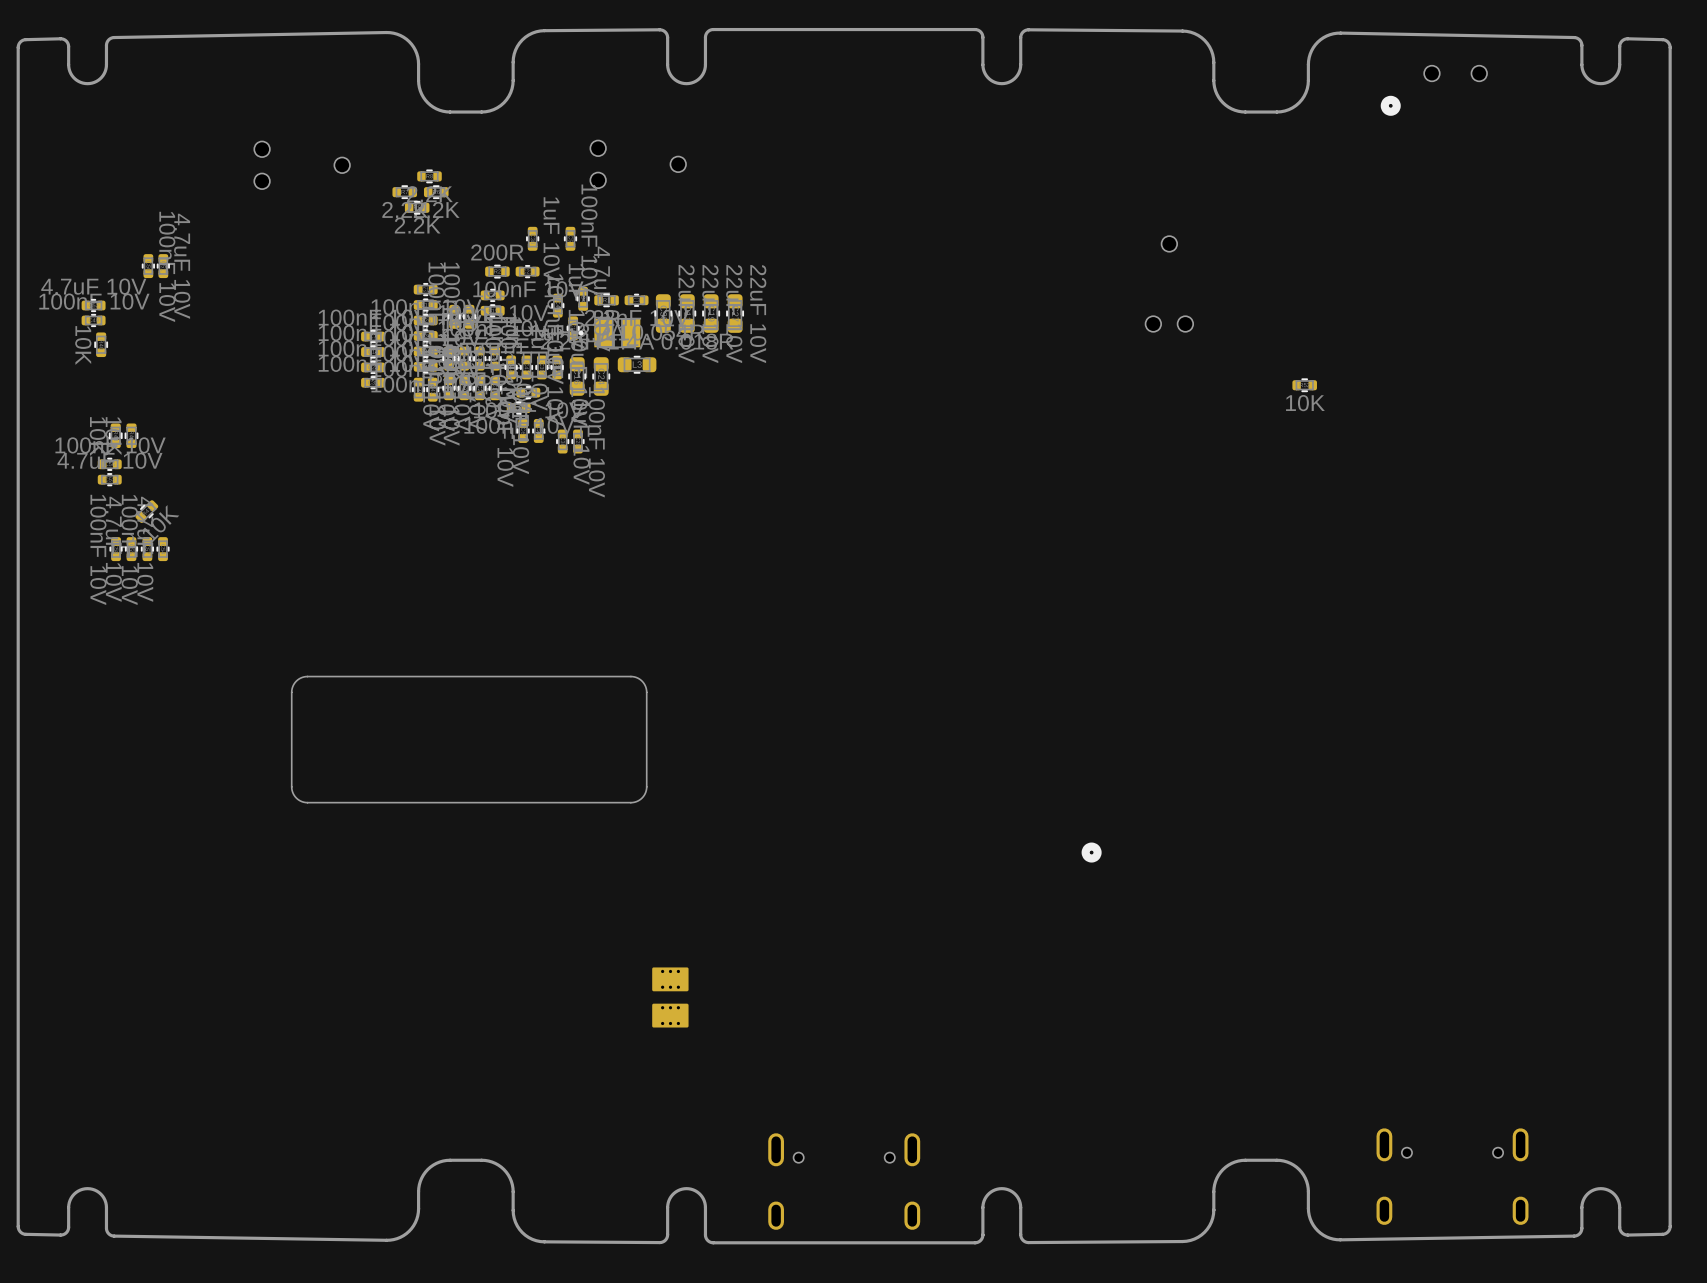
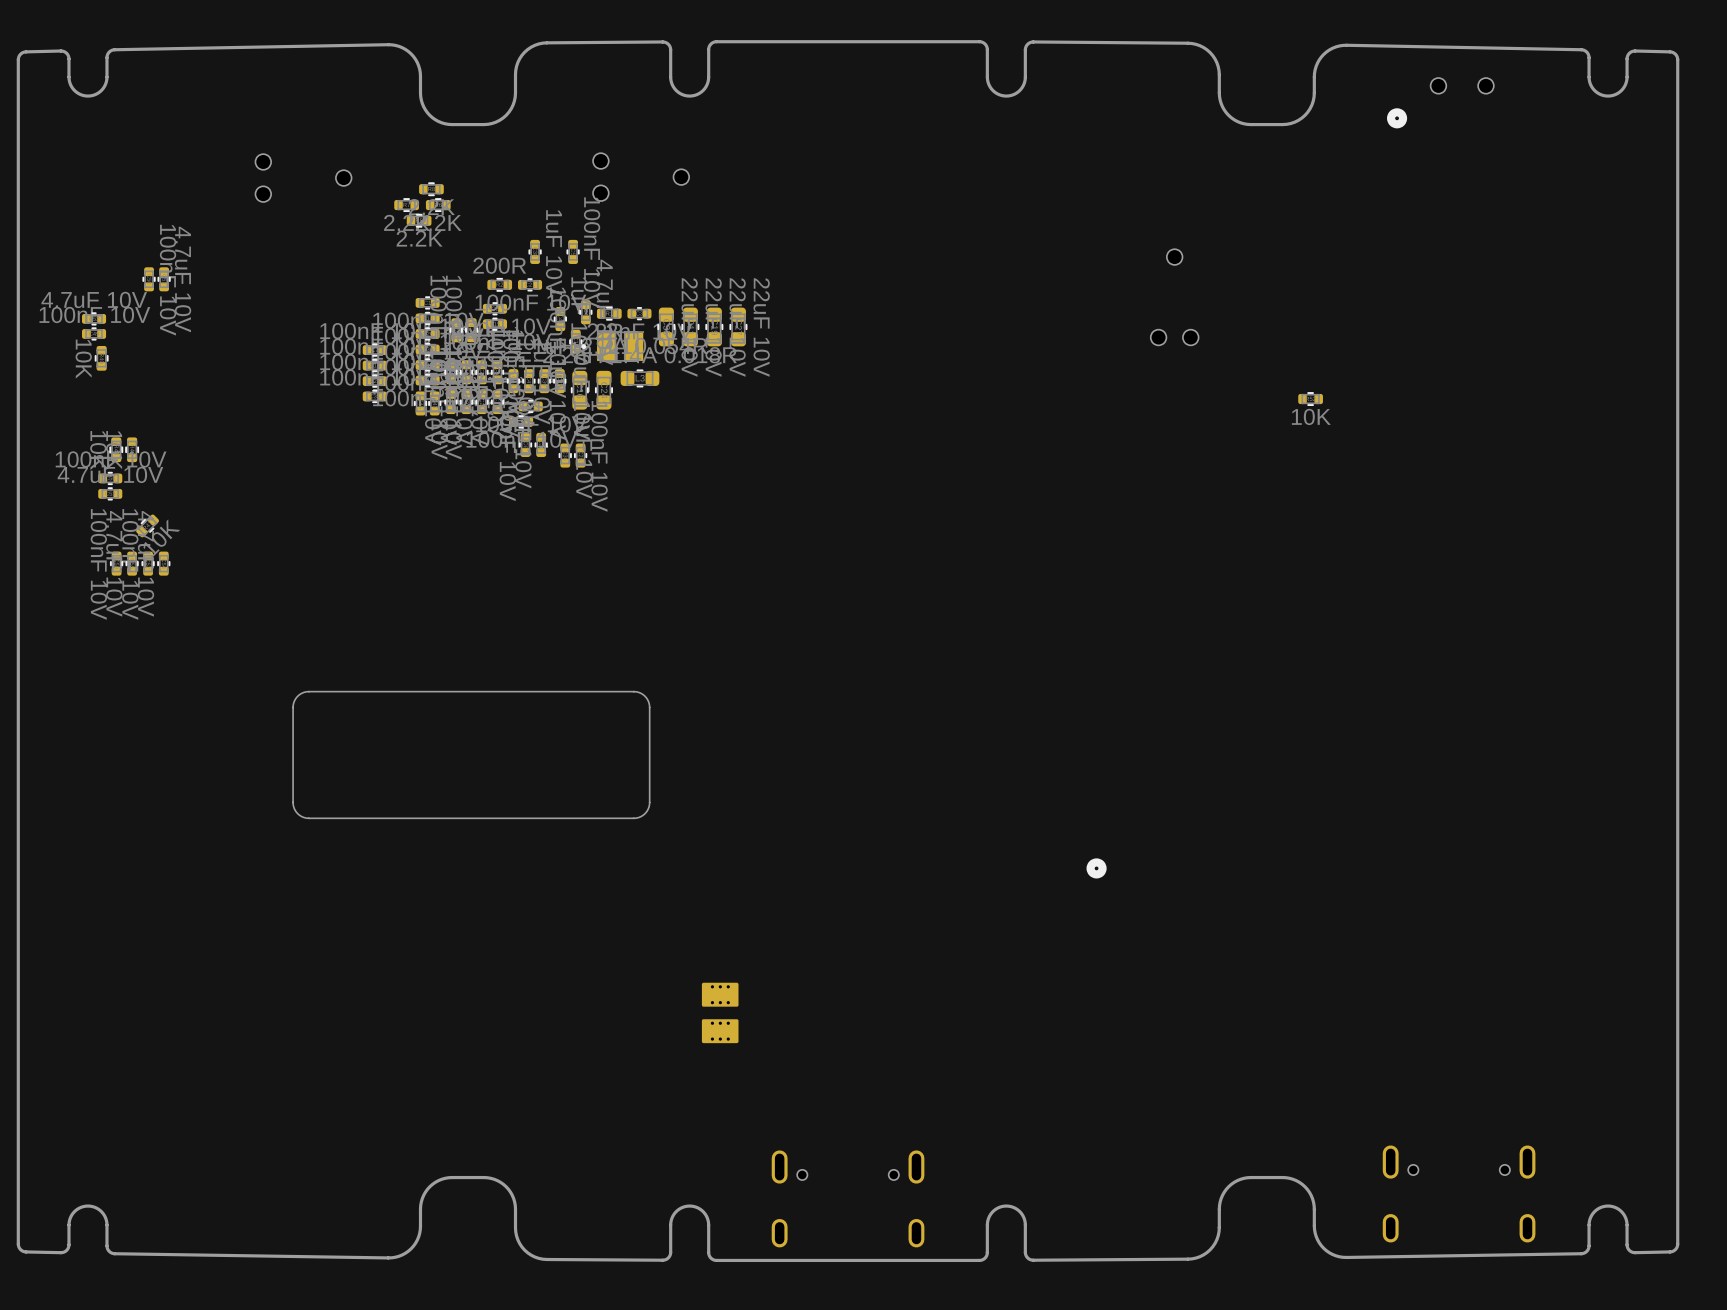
part position: (670, 997) -> (720, 1012)

